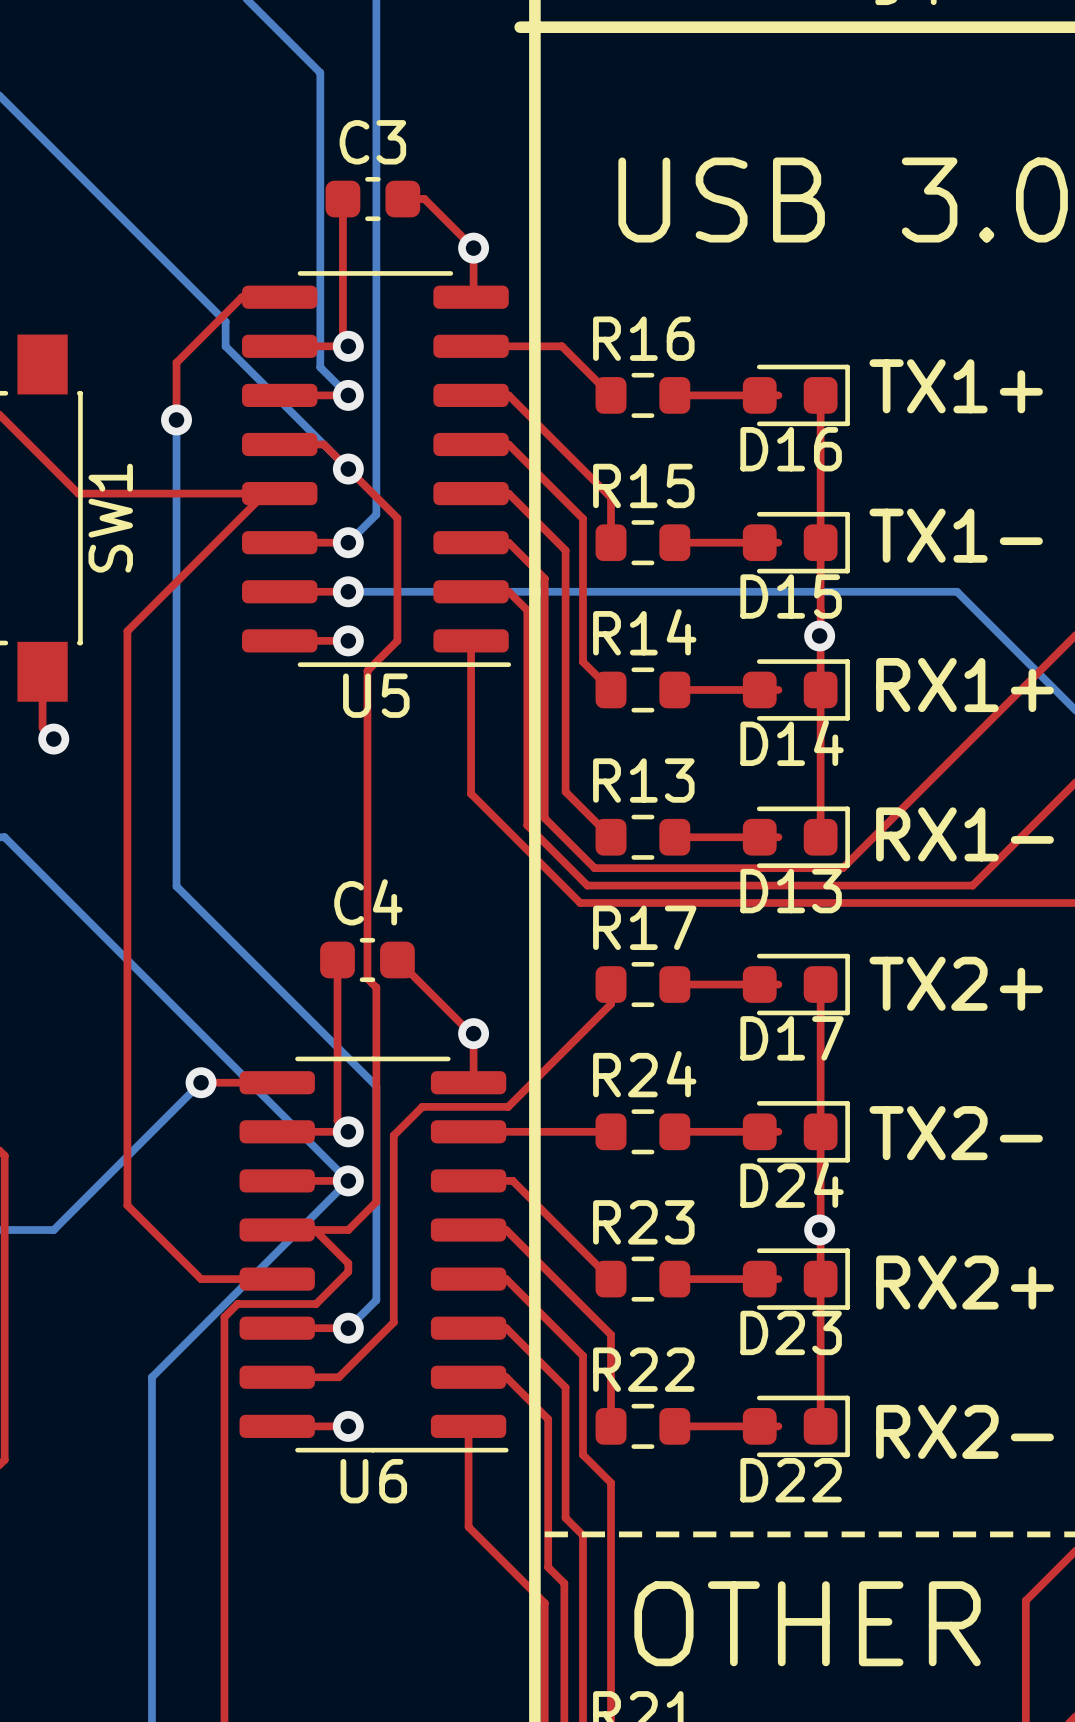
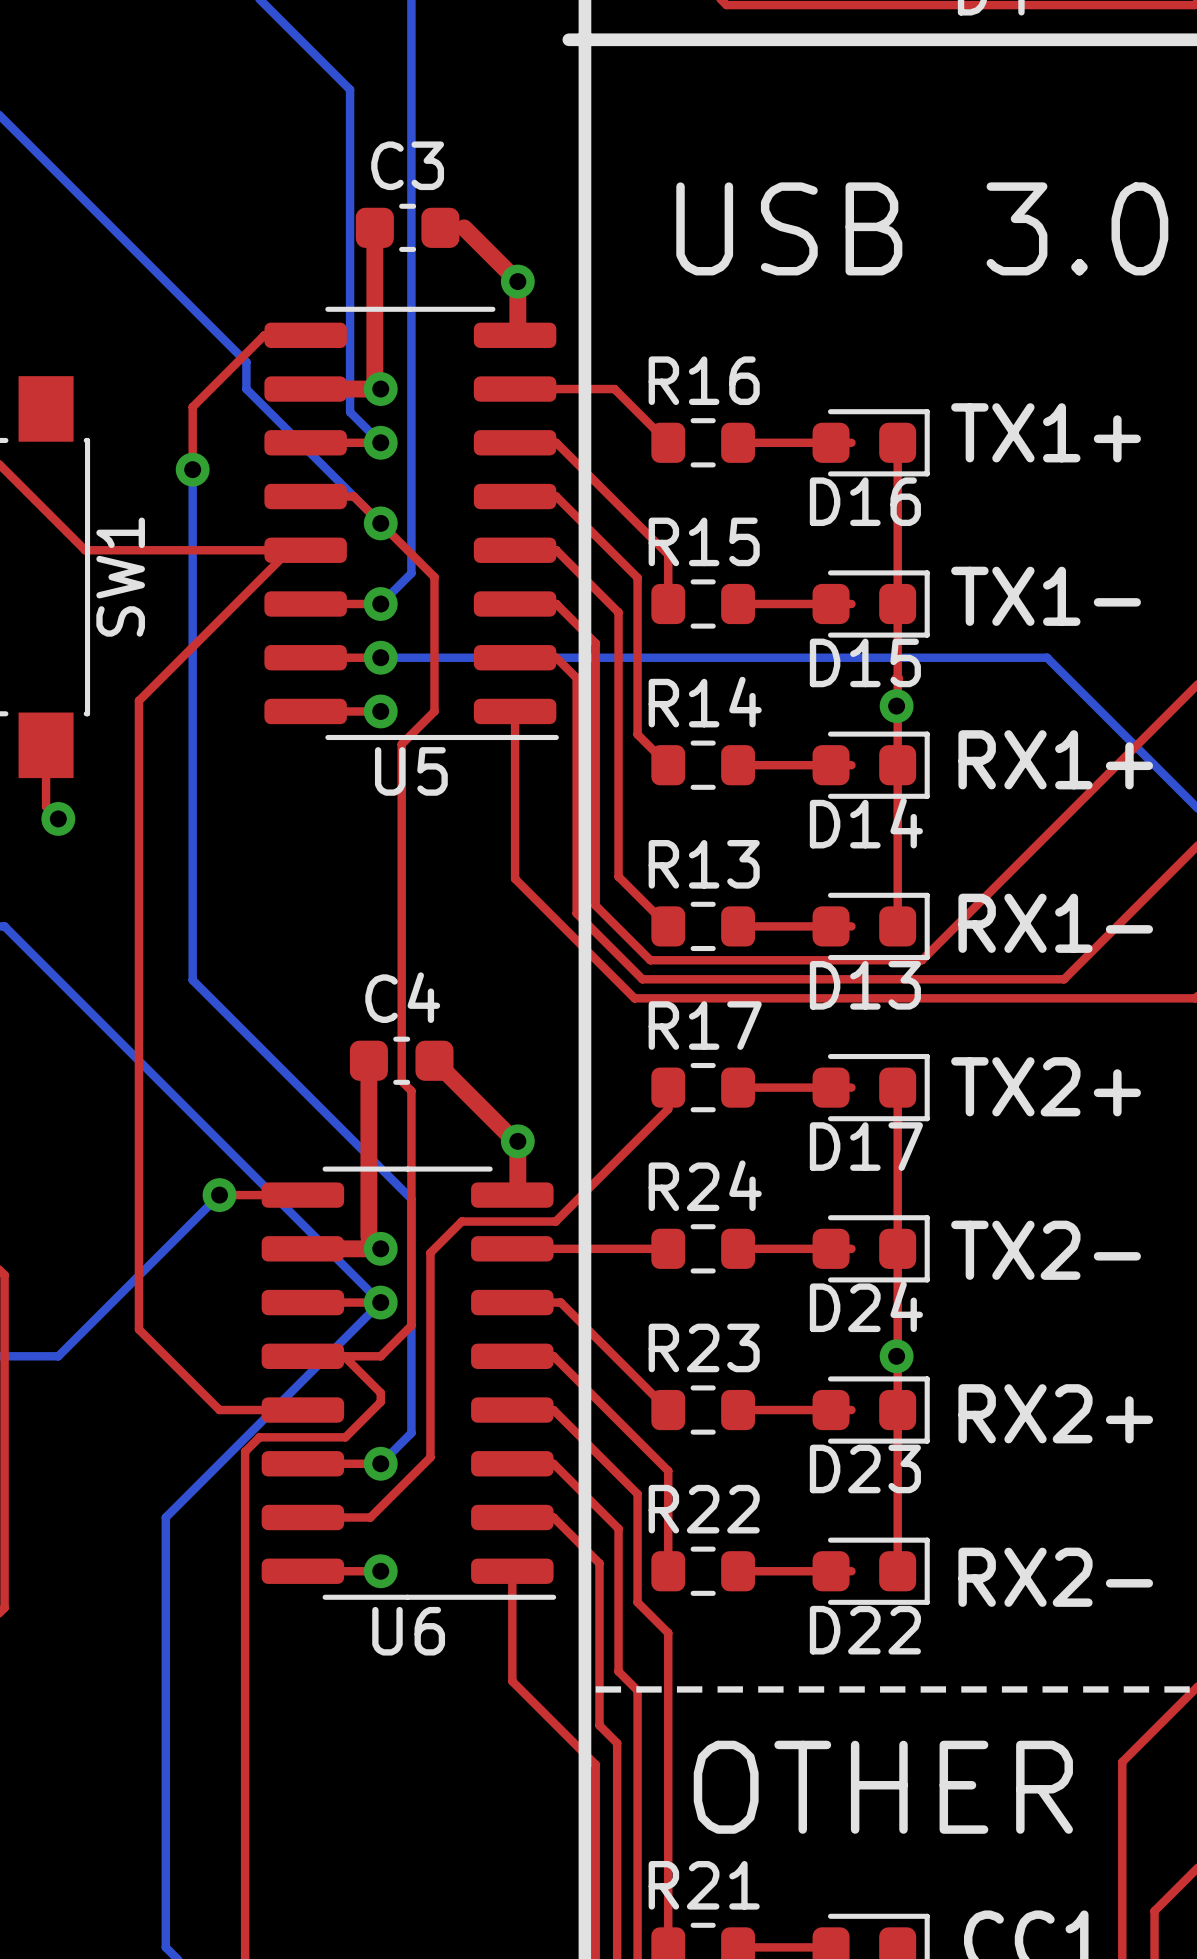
top track width: thin (342, 199) (342, 340) (348, 346) (279, 346) -> thick (374, 227) (374, 383) (380, 389) (305, 389)
top track width: thin (402, 199) (424, 199) (473, 248) (473, 294) (471, 297) -> thick (440, 227) (464, 227) (517, 281) (517, 332) (515, 335)
top track width: thin (337, 959) (337, 1120) (348, 1131) (277, 1131) -> thick (368, 1060) (368, 1236) (380, 1248) (302, 1248)
top track width: thin (397, 959) (471, 1033) (473, 1033) (473, 1077) (468, 1082) -> thick (434, 1060) (515, 1141) (517, 1141) (517, 1189) (512, 1195)

